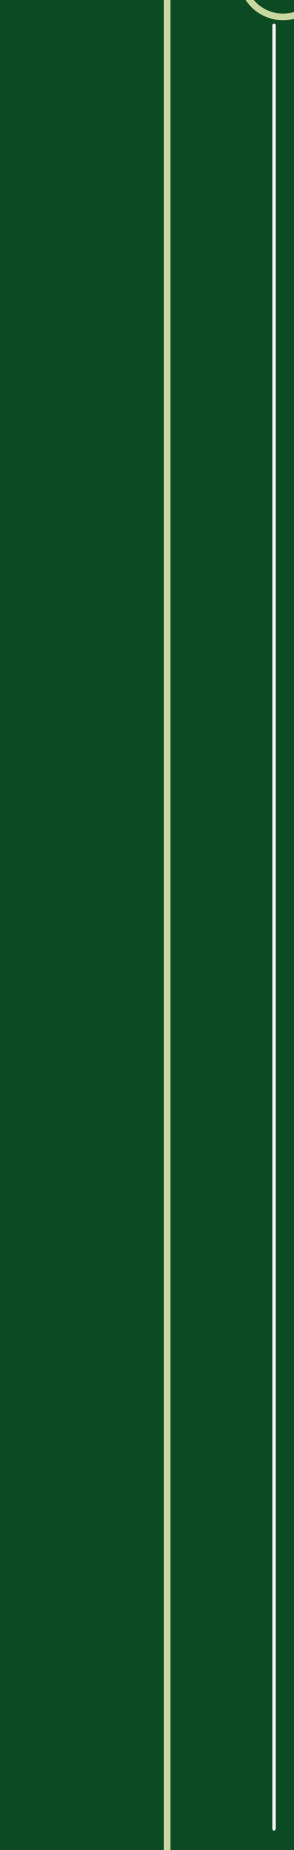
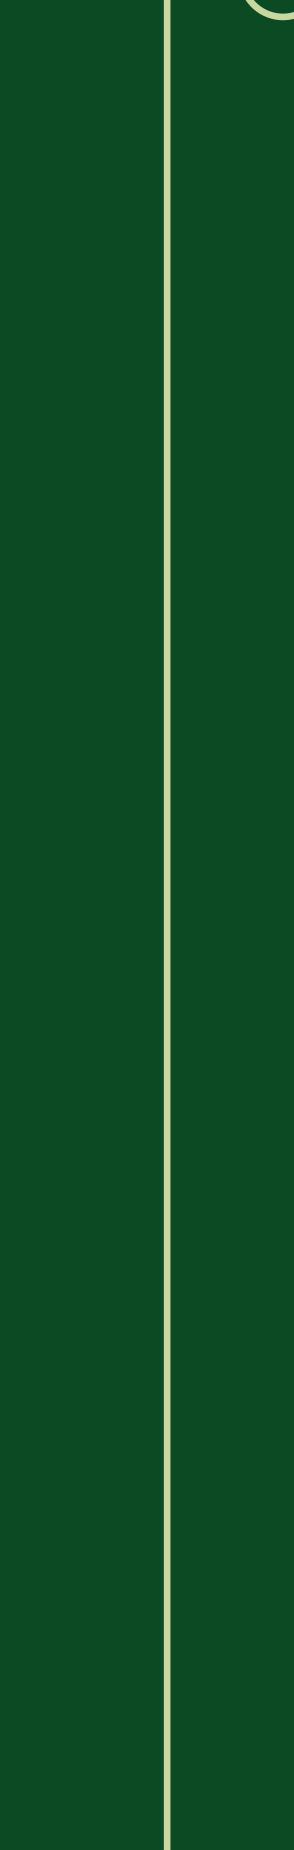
line: (274, 25) (274, 1829) -> none

